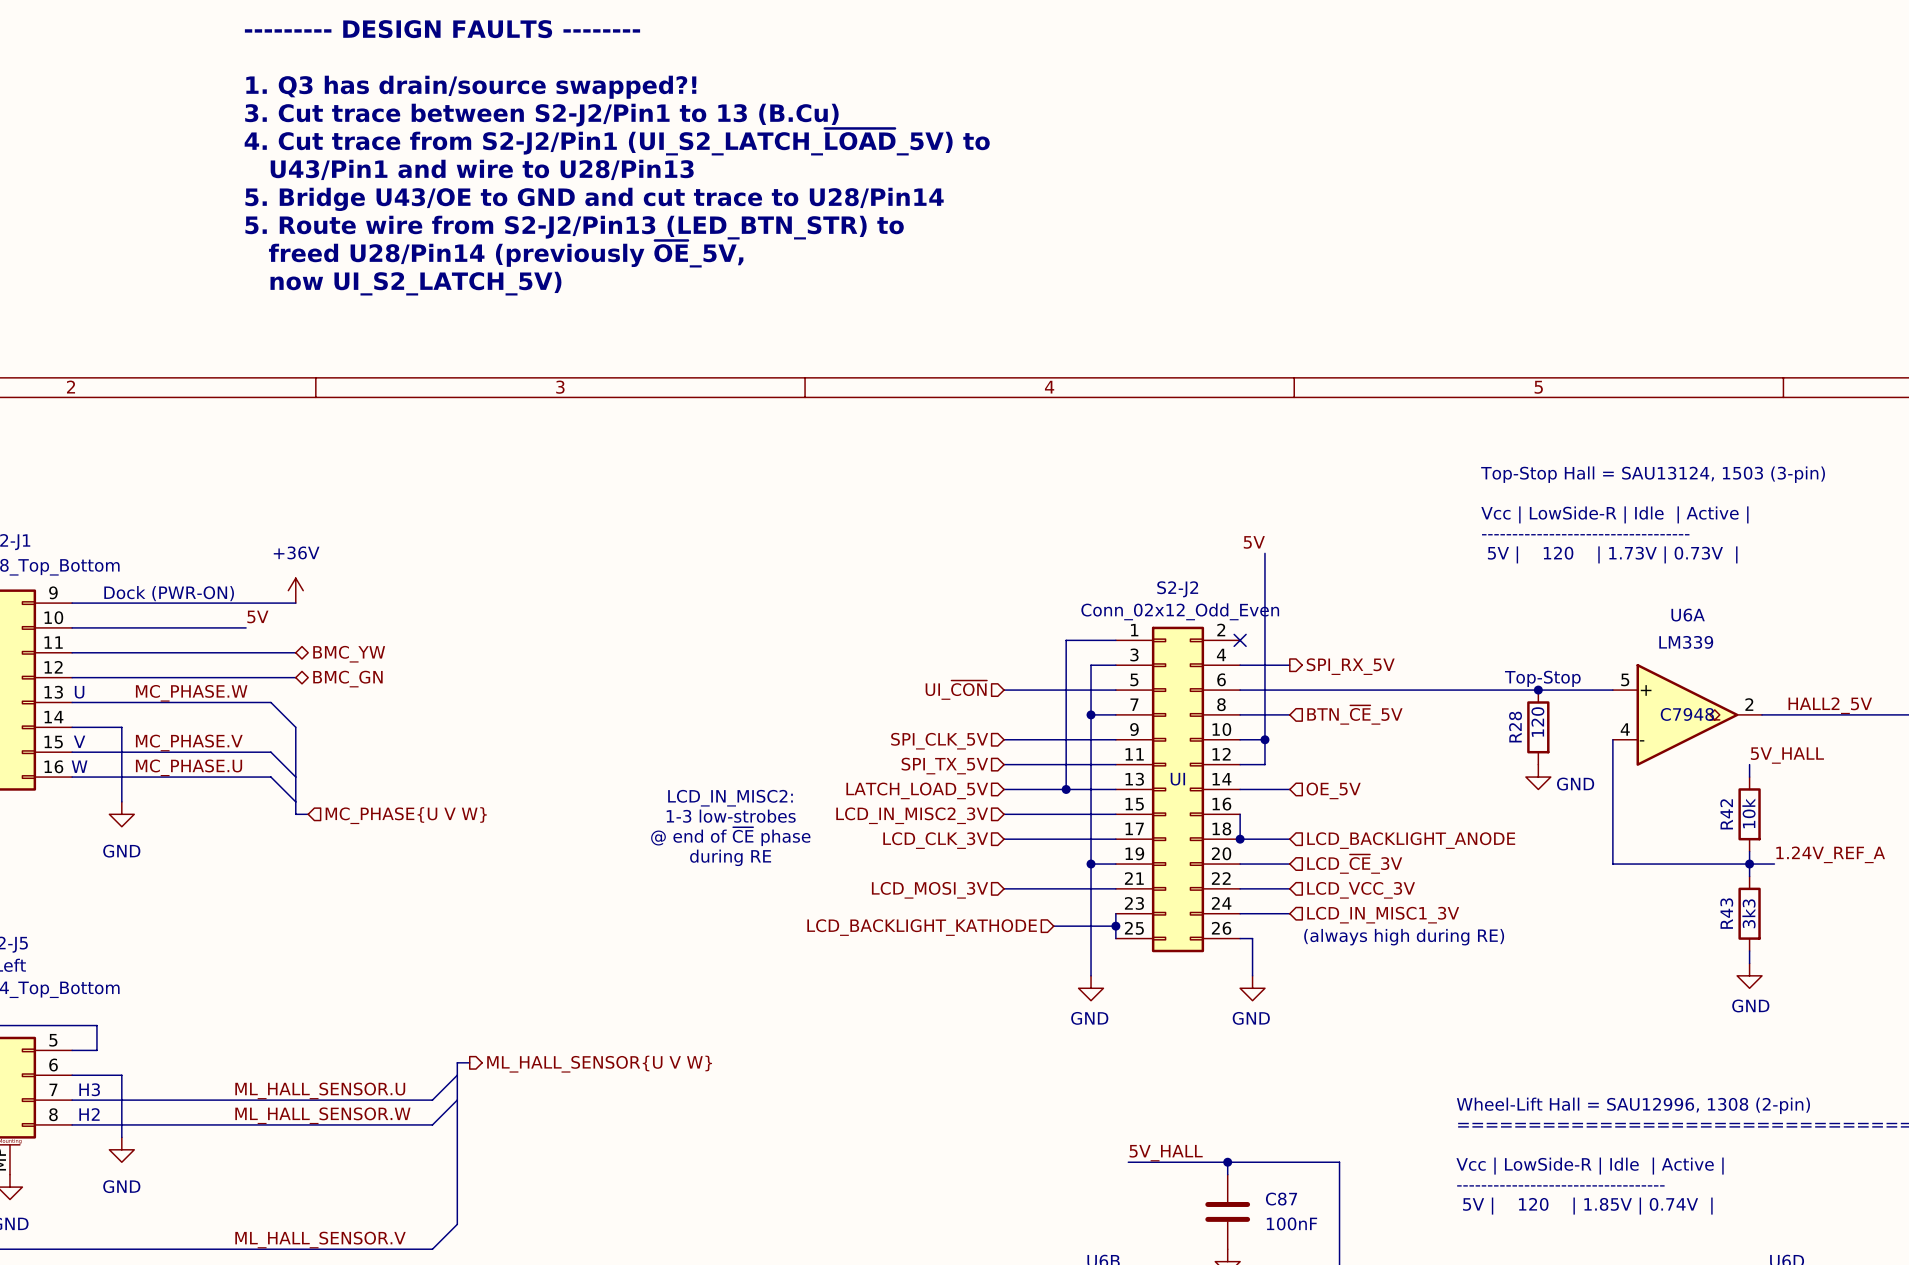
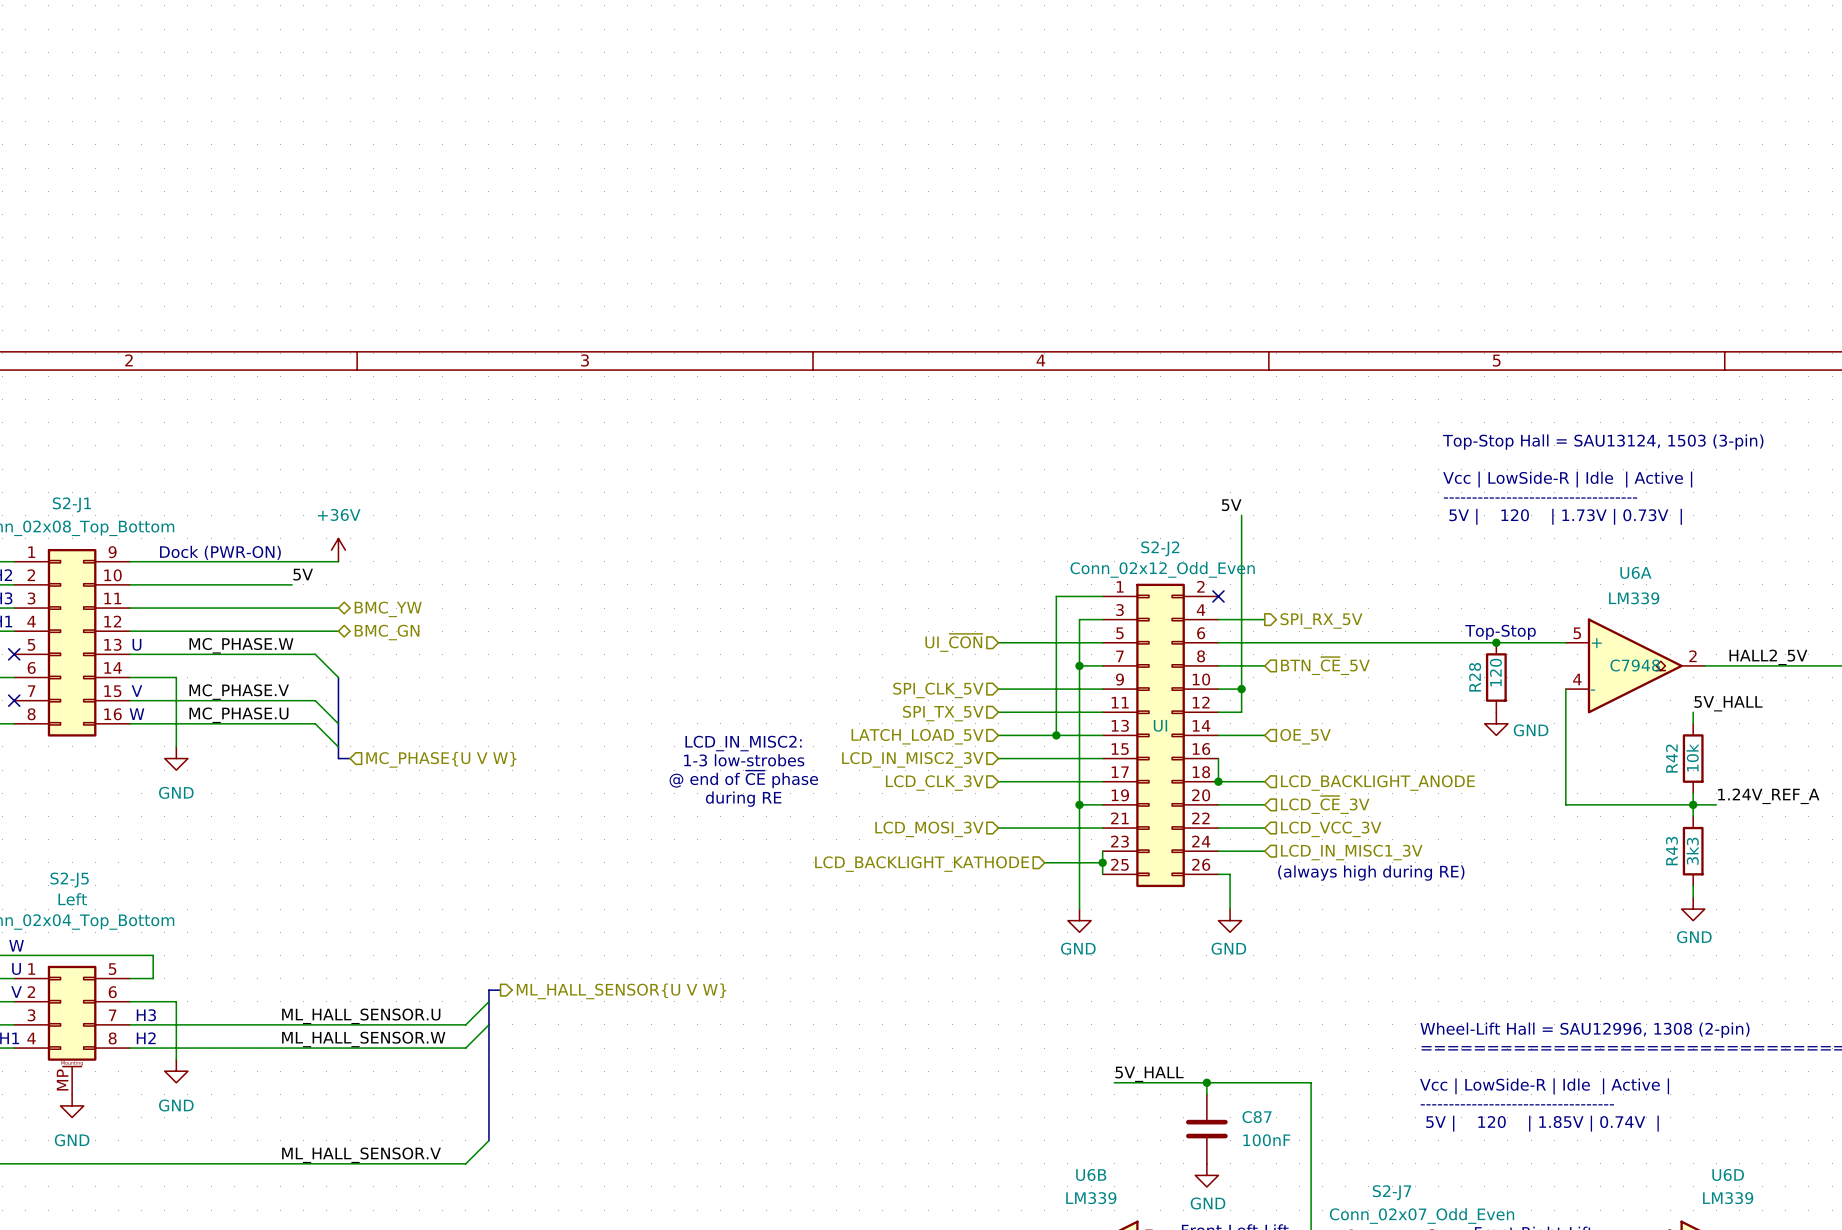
text: --------- DESIGN FAULTS -------- (442, 29) -> none
text: 1. Q3 has drain/source swapped?! (471, 87) -> none
text: 3. Cut trace between S2-J2/Pin1 to 13 (B.Cu) (541, 115) -> none
text: 4. Cut trace from S2-J2/Pin1 (UI_S2_LATCH_~{LOAD}_5V) to (617, 141) -> none
text: U43/Pin1 and wire to U28/Pin13 (482, 169) -> none
text: 5. Bridge U43/OE to GND and cut trace to U28/Pin14 (594, 199) -> none
text: 5. Route wire from S2-J2/Pin13 (LED_BTN_STR) to (574, 227) -> none
text: freed U28/Pin14 (previously ~{OE}_5V, (506, 253) -> none
text: now UI_S2_LATCH_5V) (415, 283) -> none

